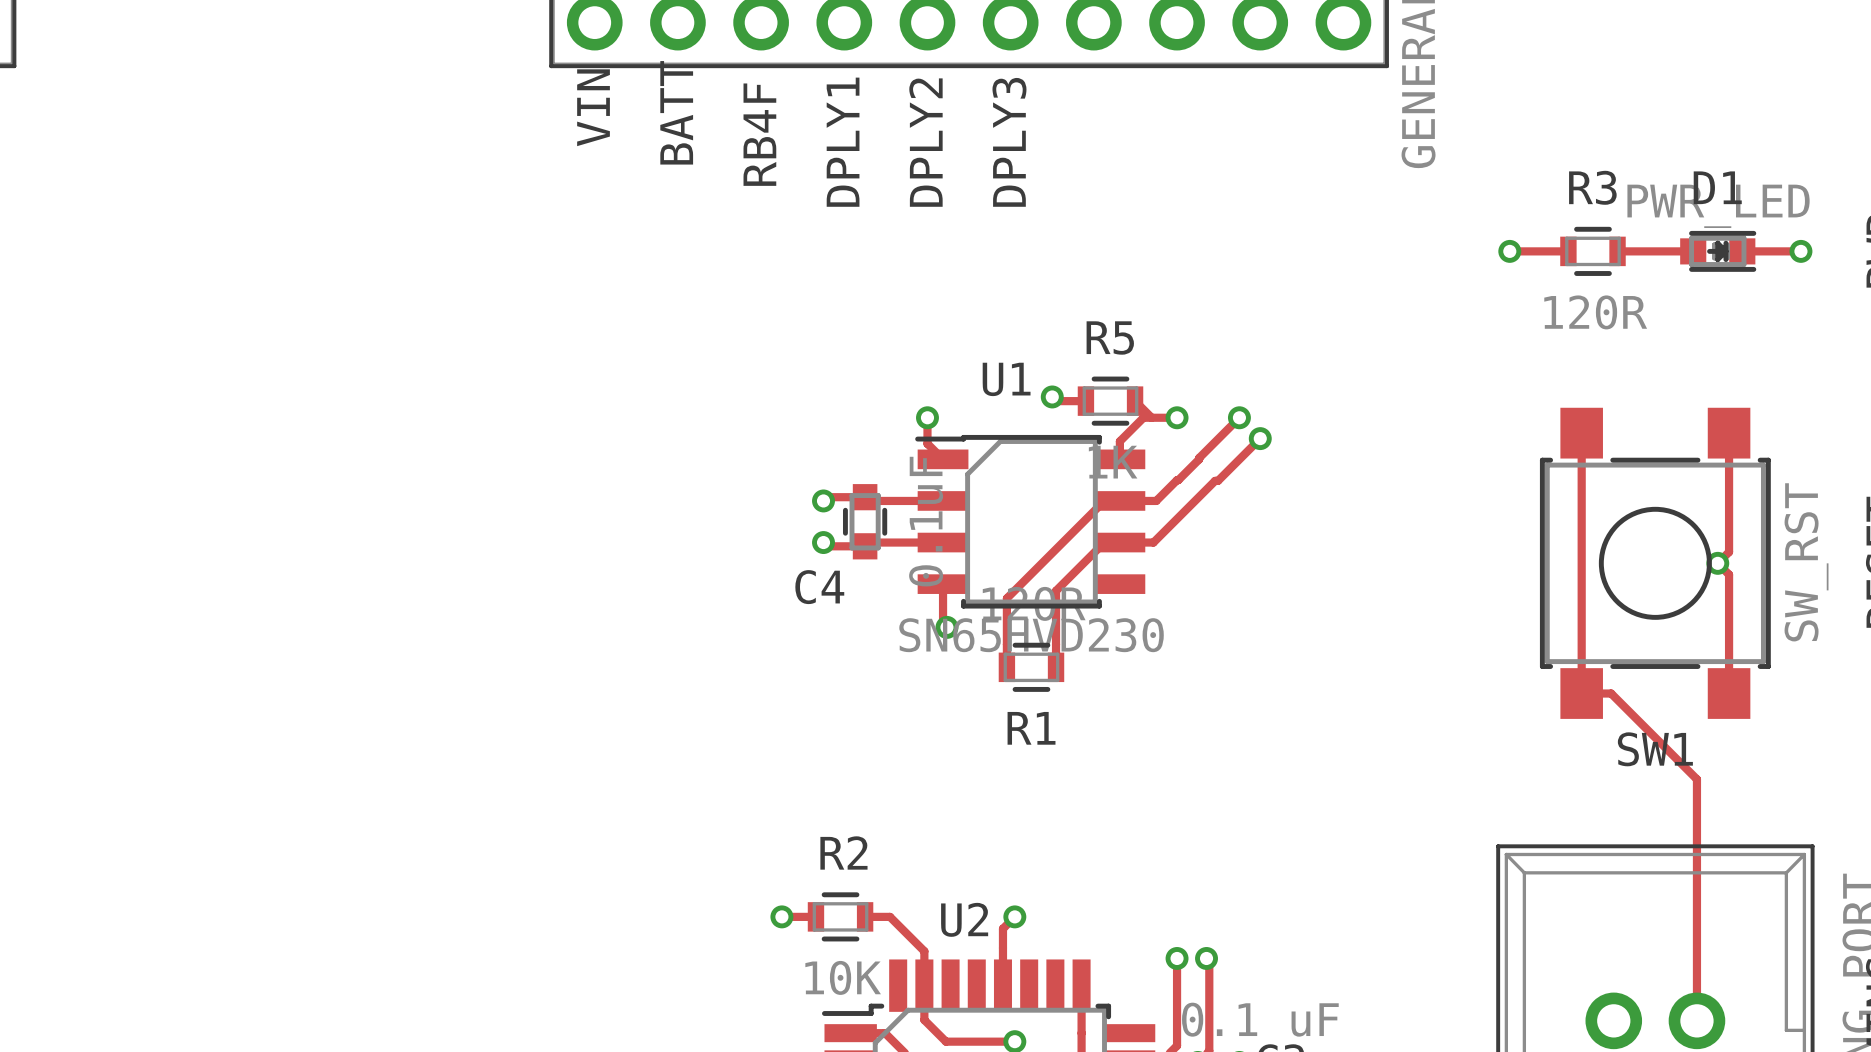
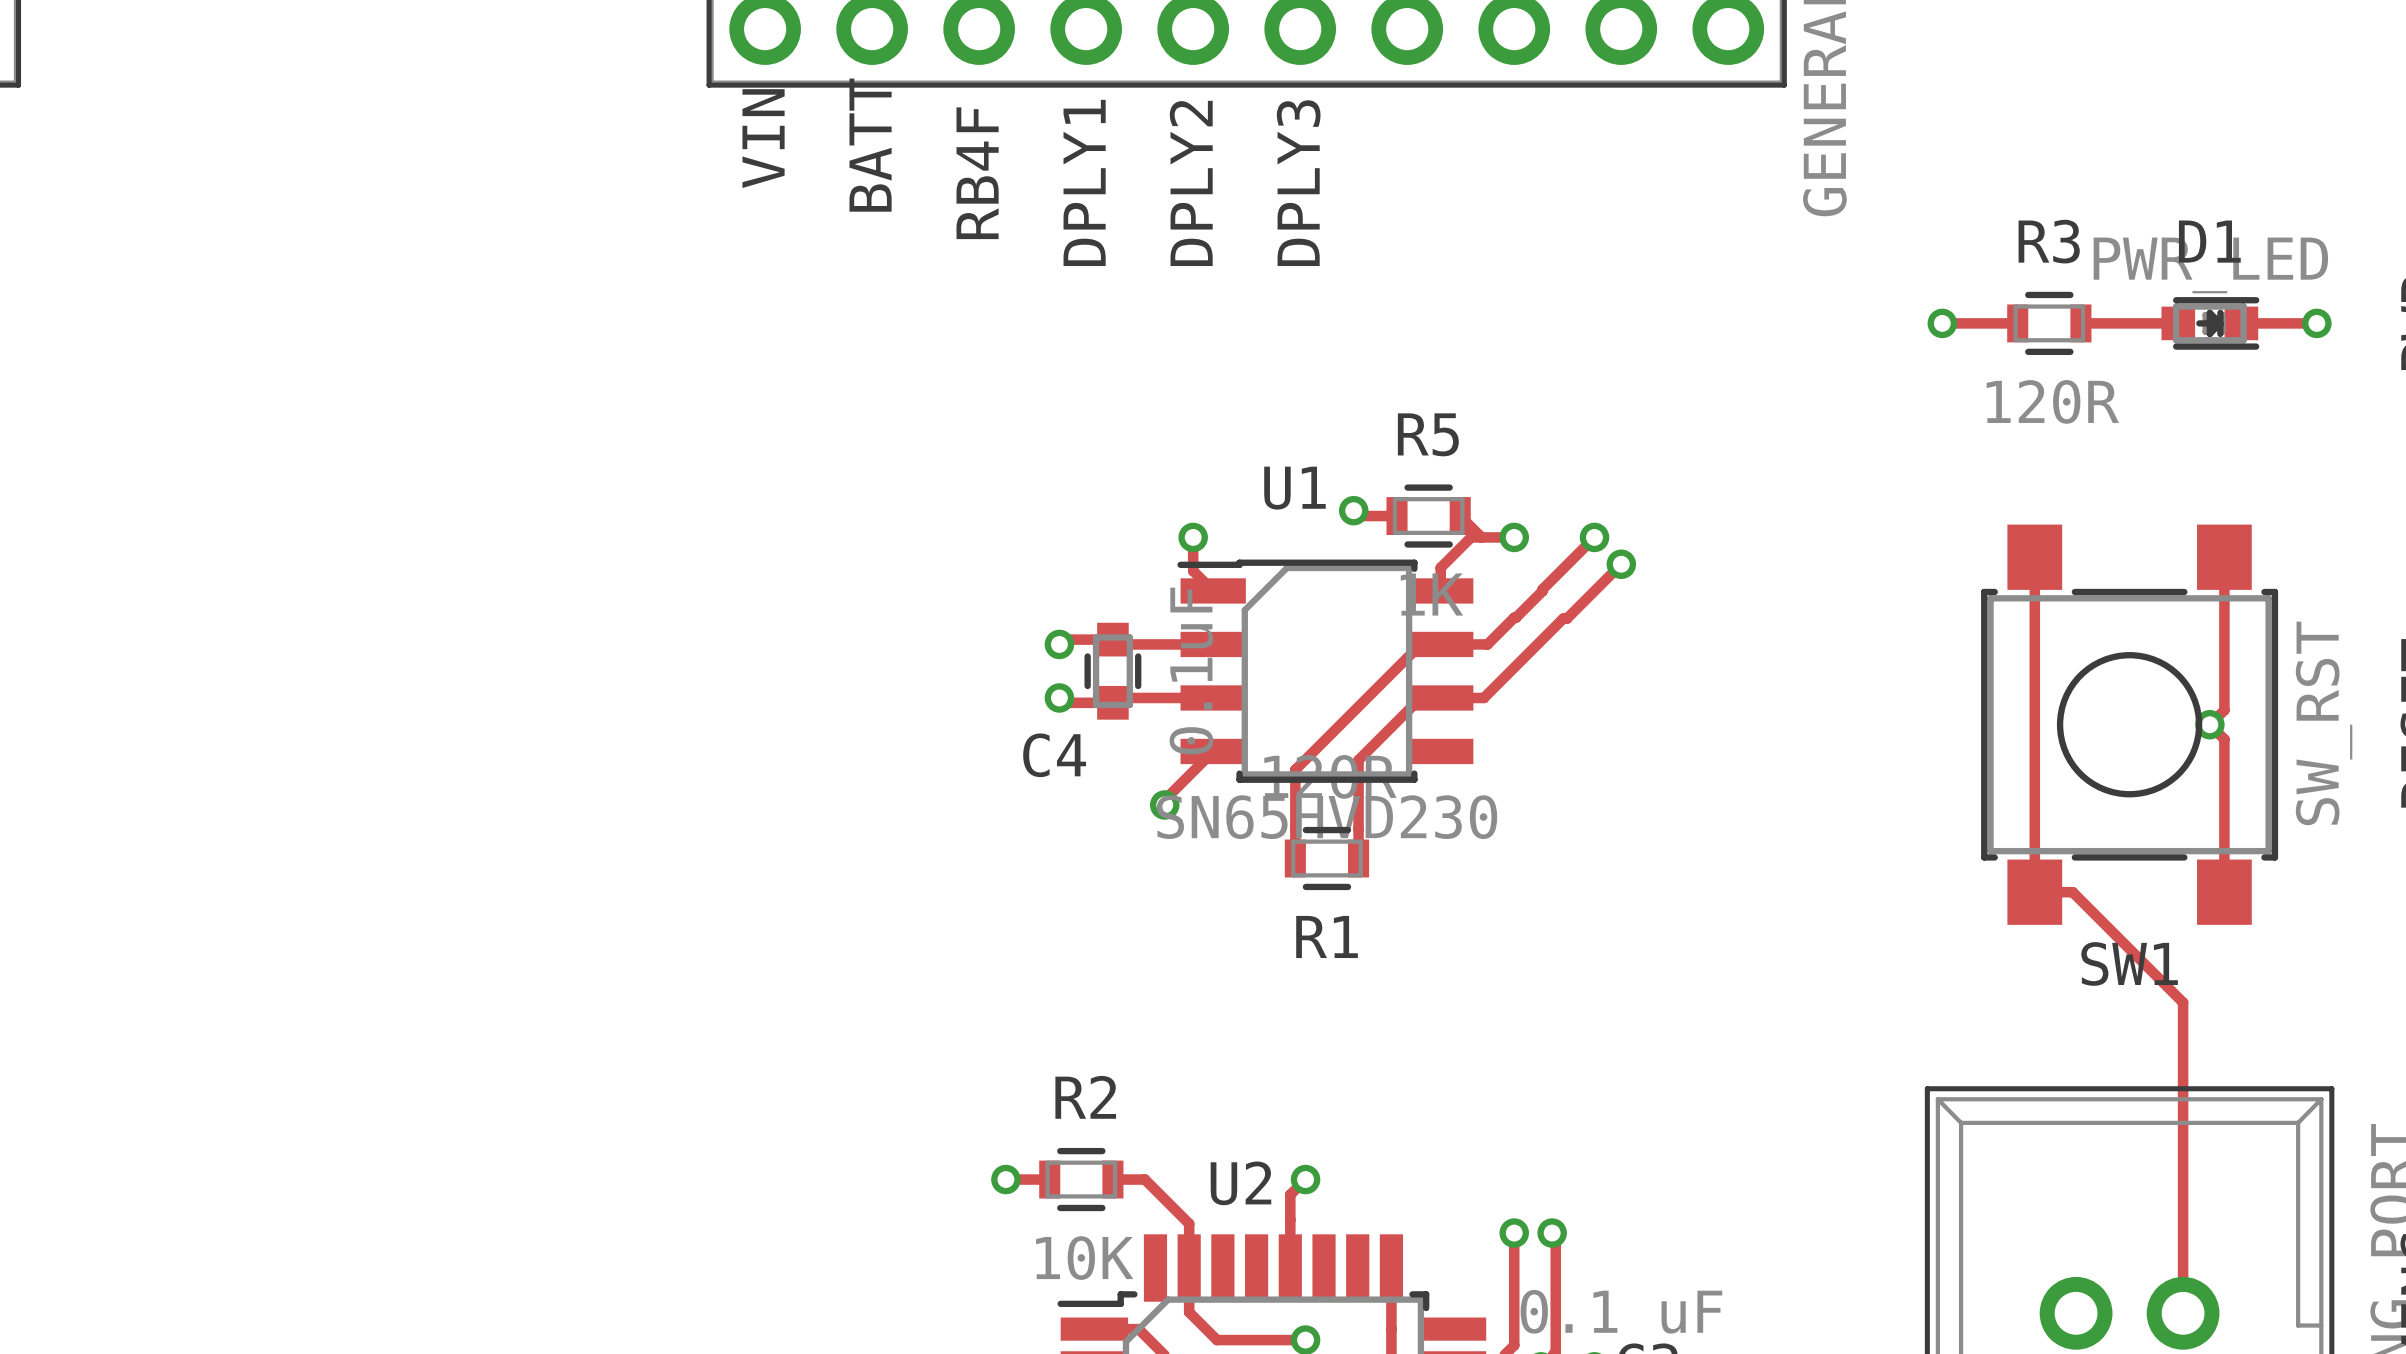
track: (943, 584) (943, 623) (946, 627) -> (1213, 751) (1164, 799) (1164, 804)
via position: (946, 627) -> (1164, 804)

